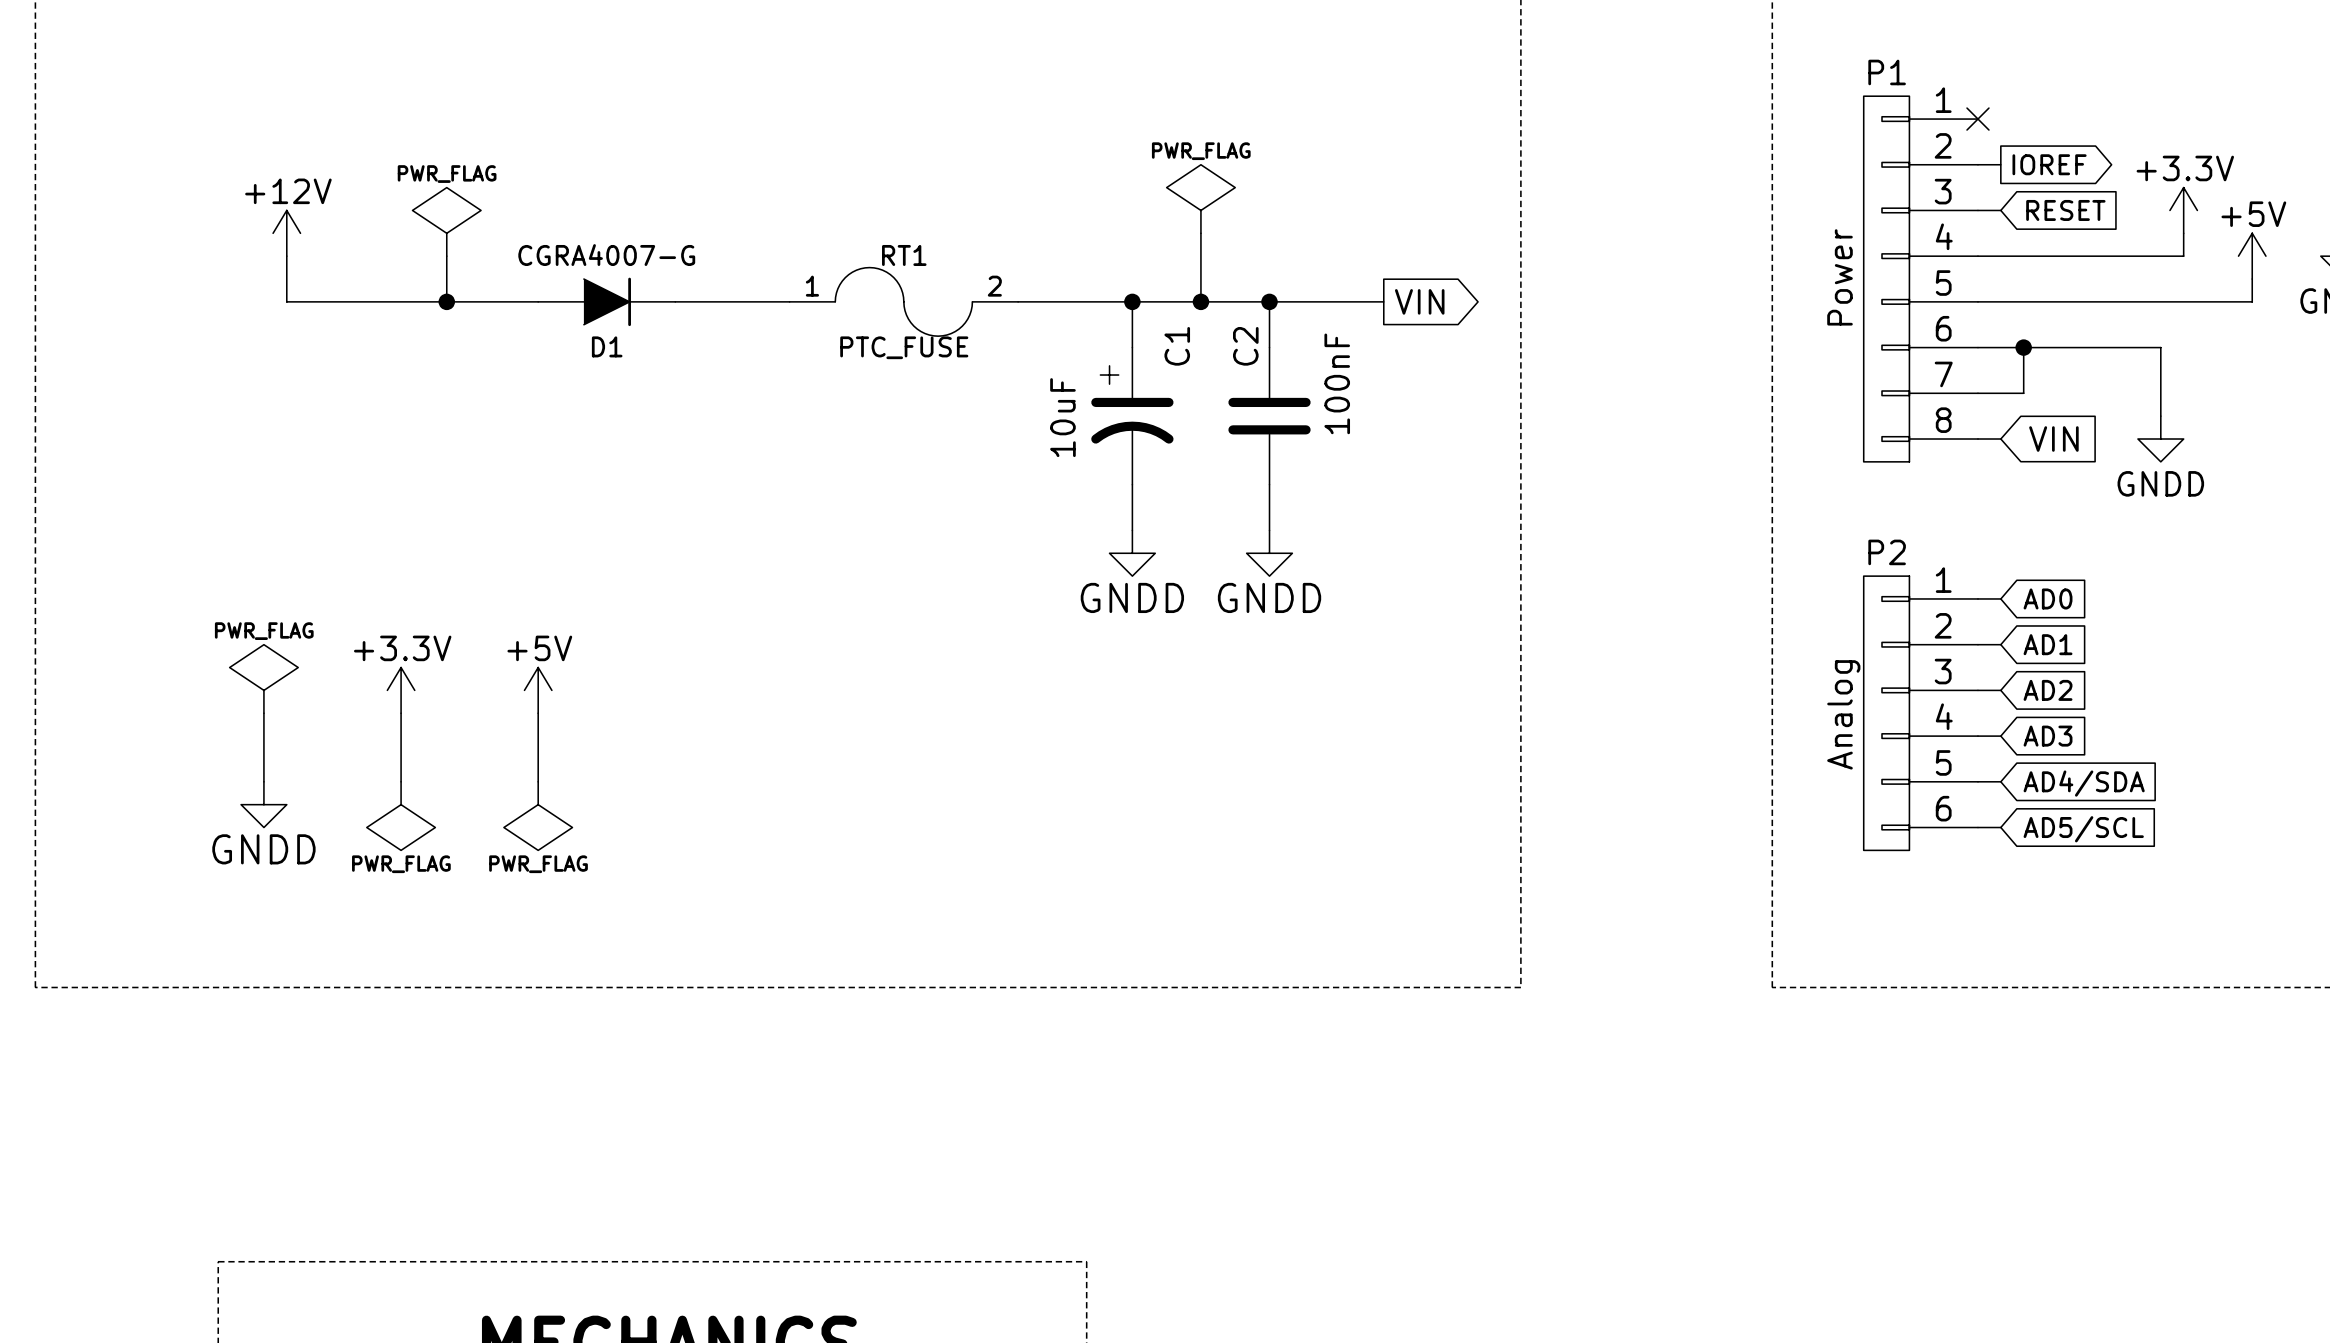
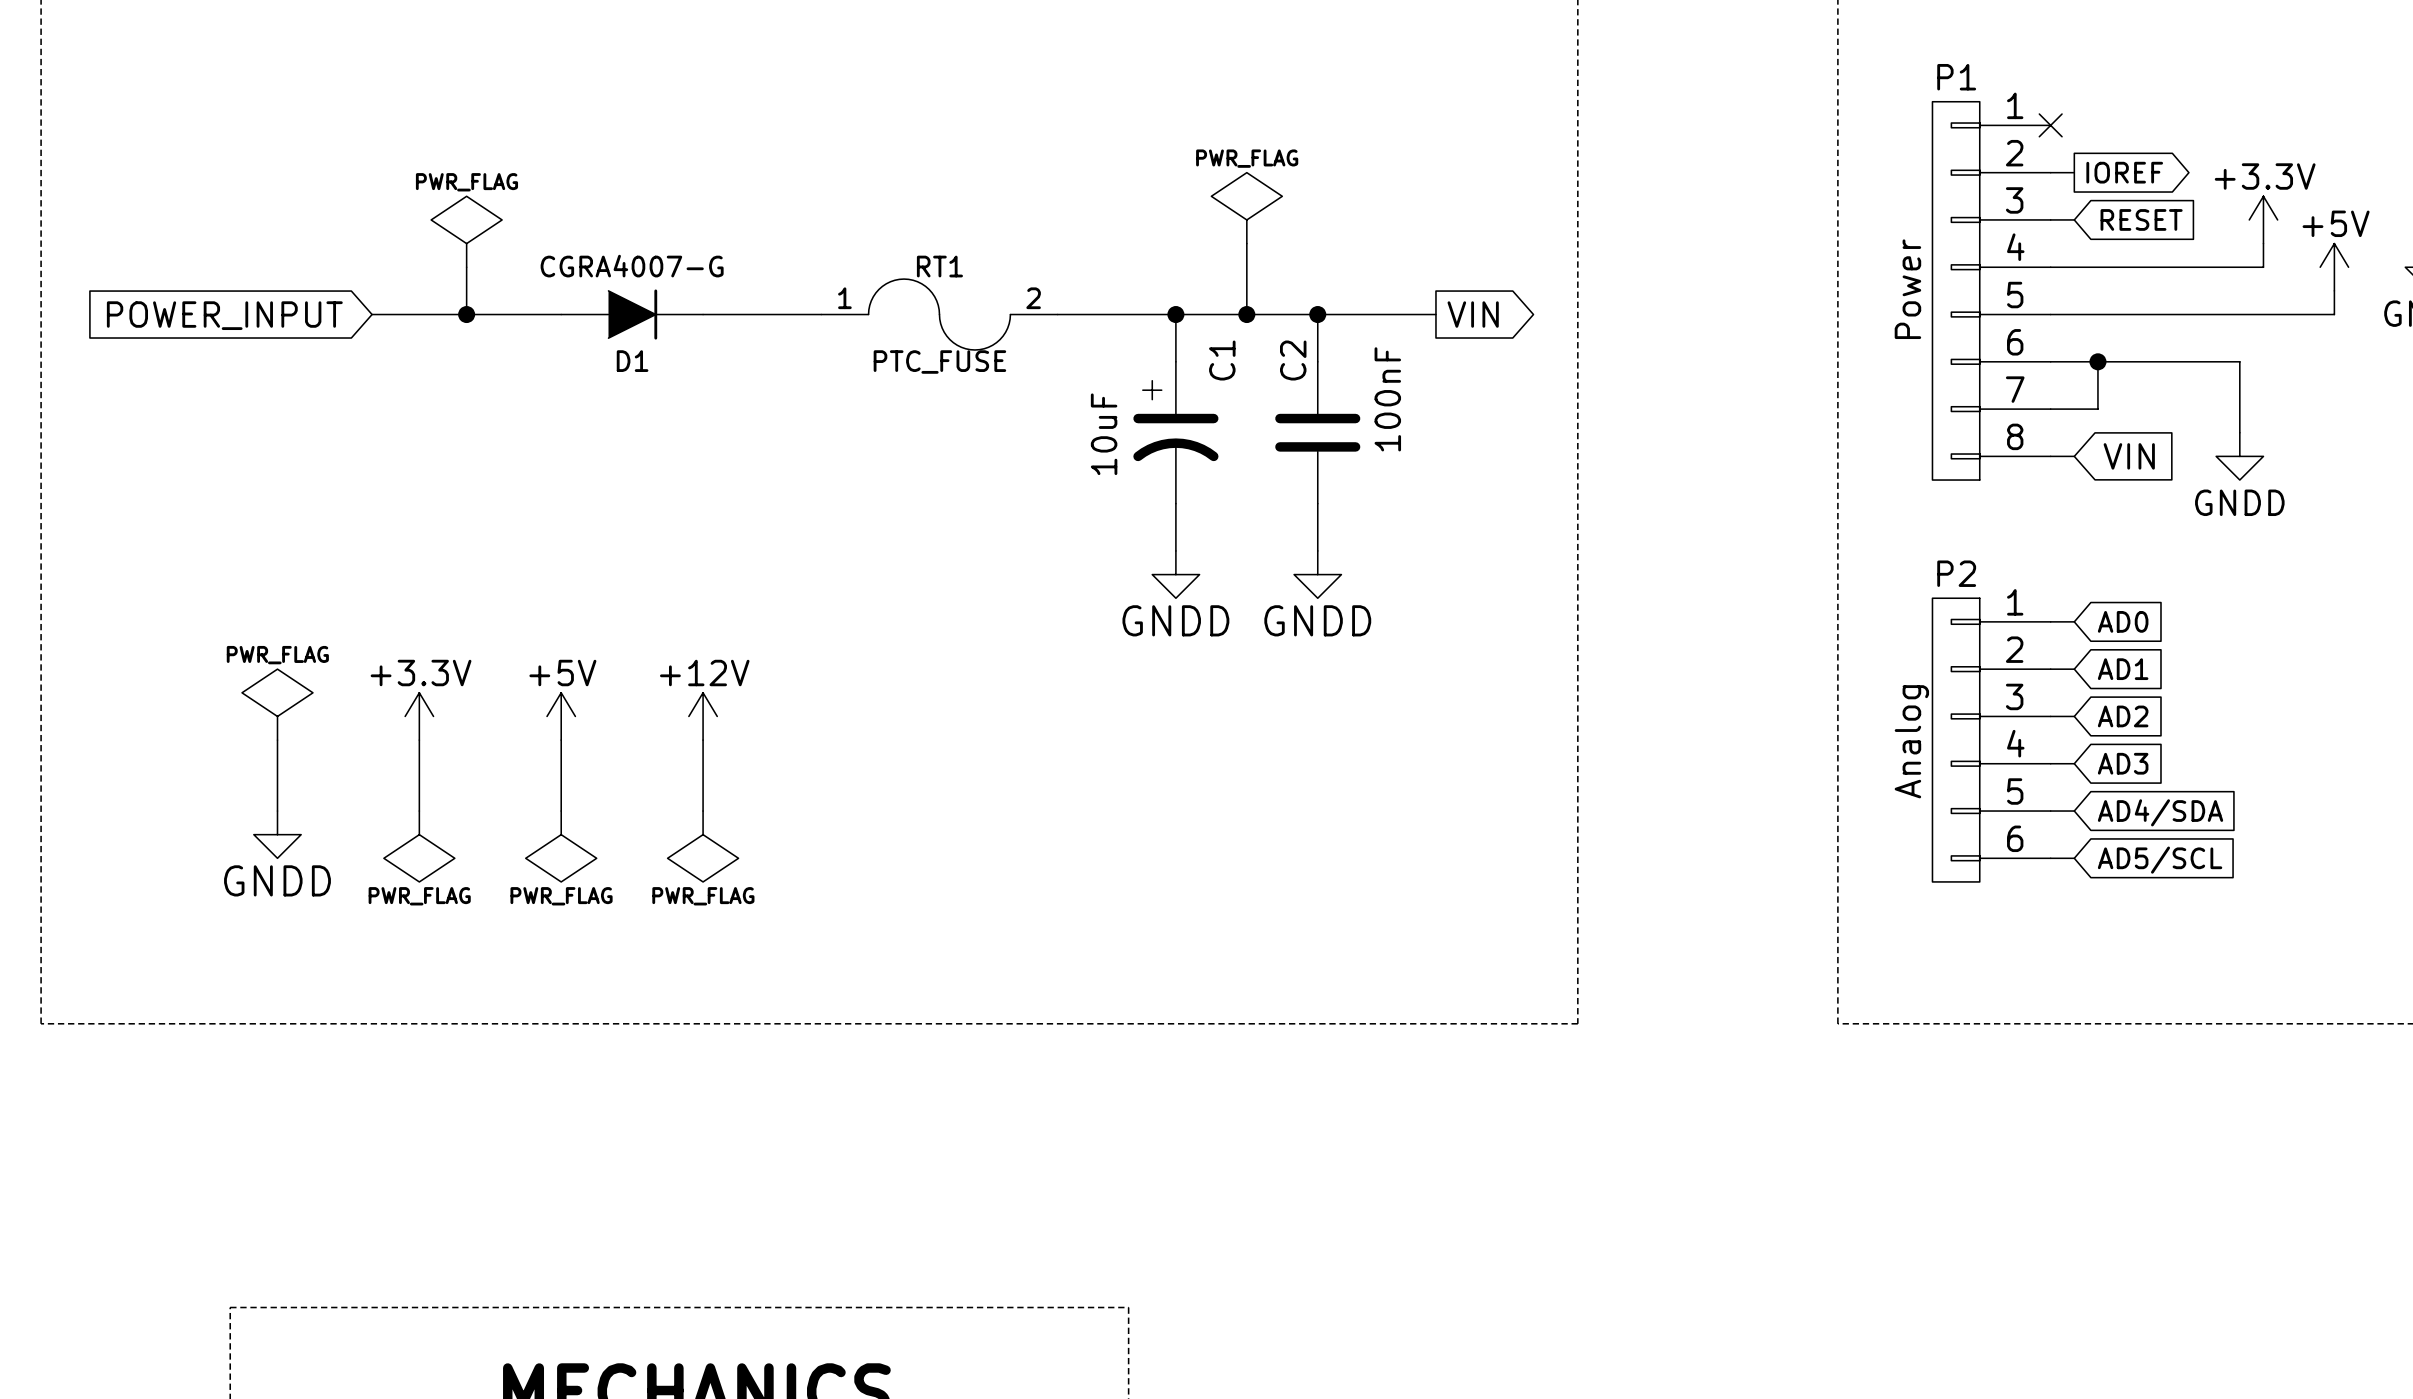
power symbol: +12V (286, 233) -> none
wire: (286, 256) (286, 301) (355, 301) -> none
global label: none -> POWER_INPUT (224, 315)
power symbol: none -> +12V (703, 716)
wire: none -> (703, 740) (703, 811)
power symbol: none -> PWR_FLAG (703, 846)

